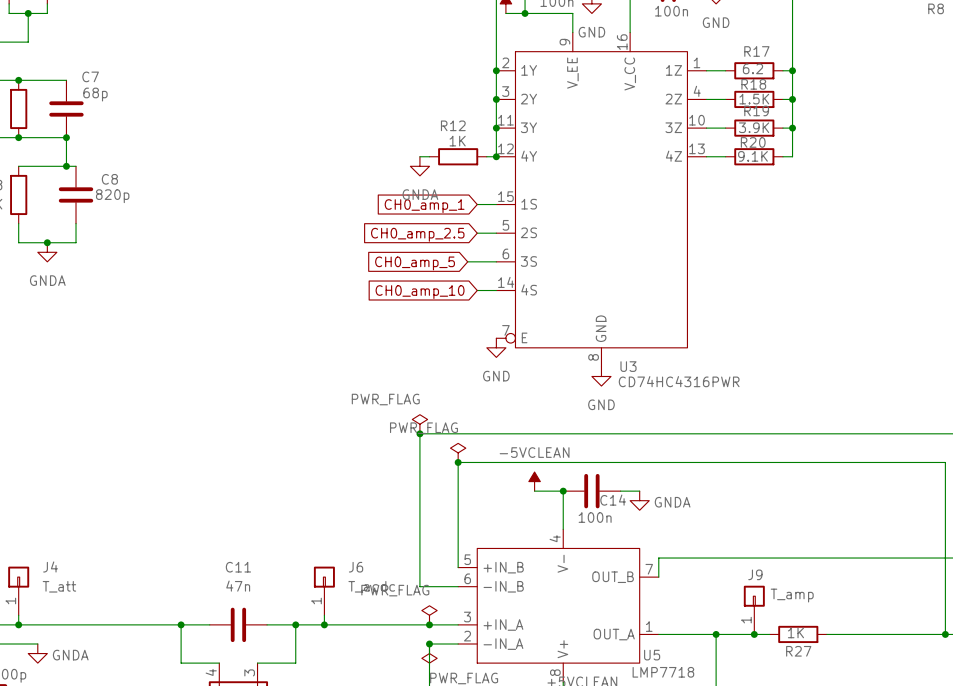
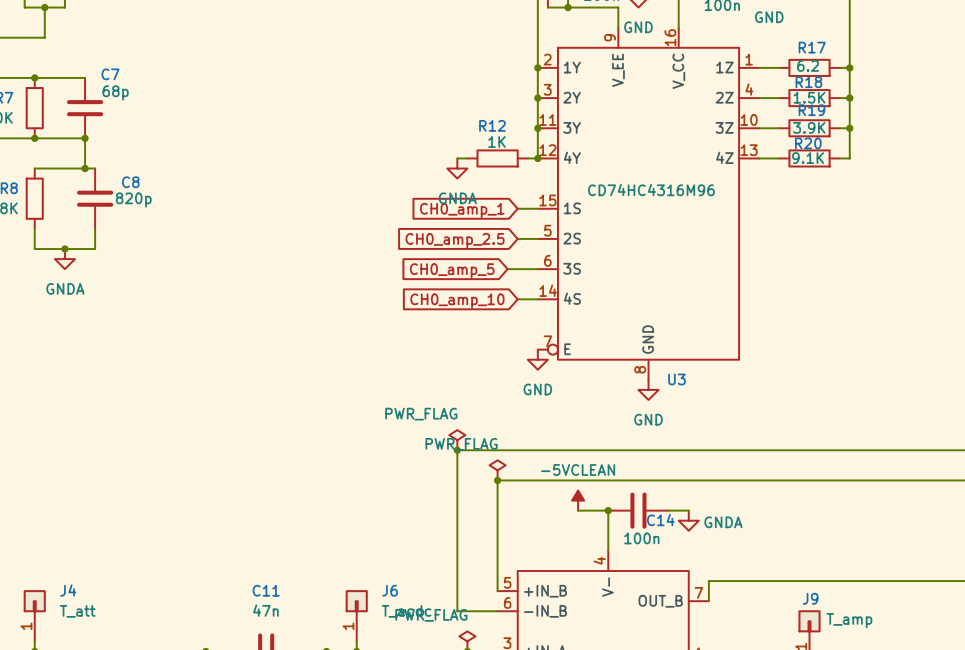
U3 value: CD74HC4316PWR (679, 381) -> CD74HC4316M96 (651, 190)

